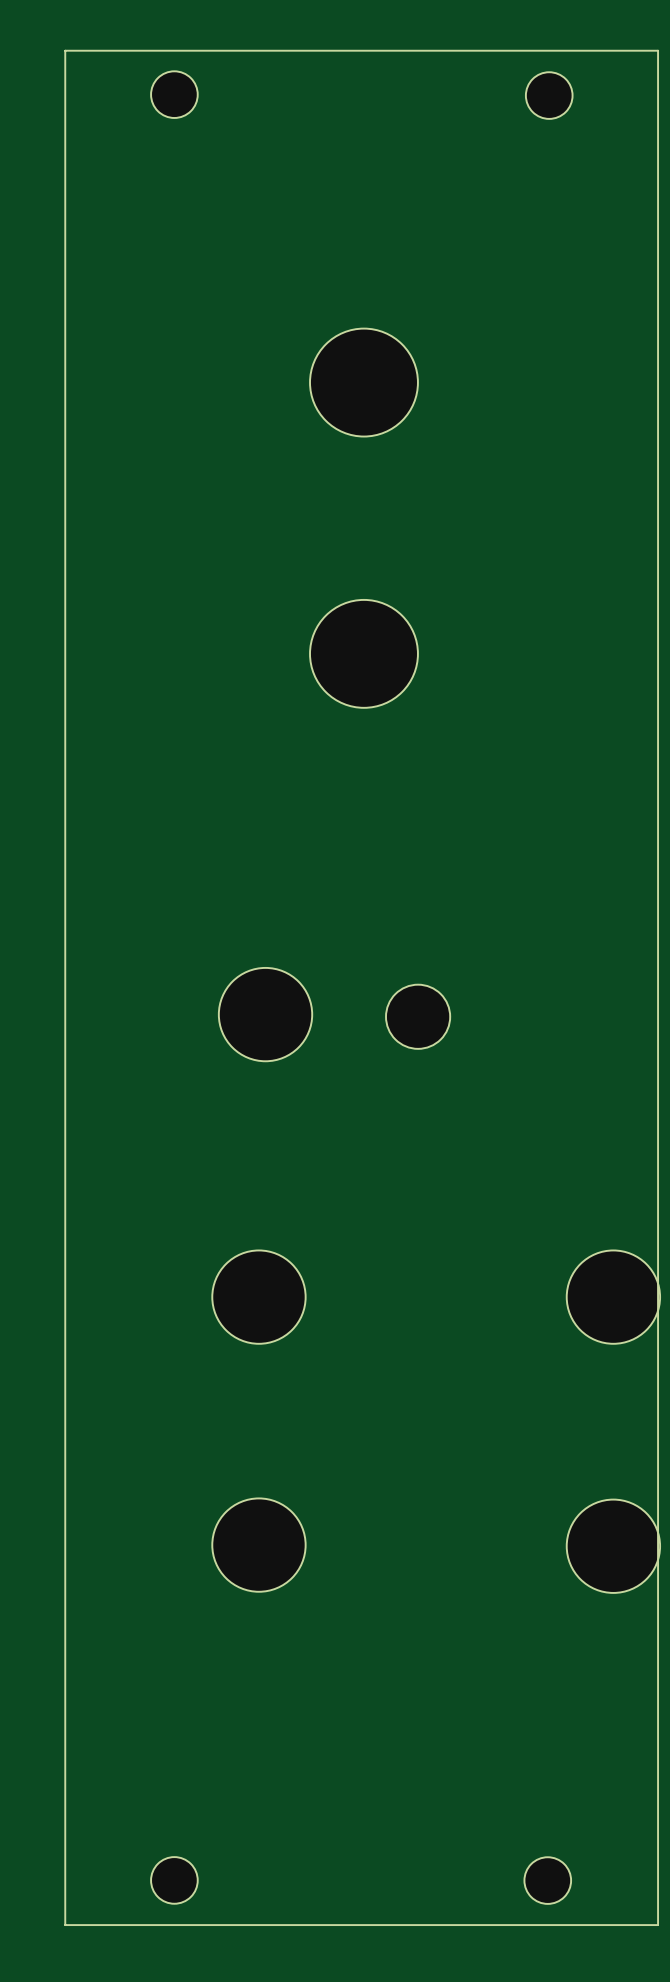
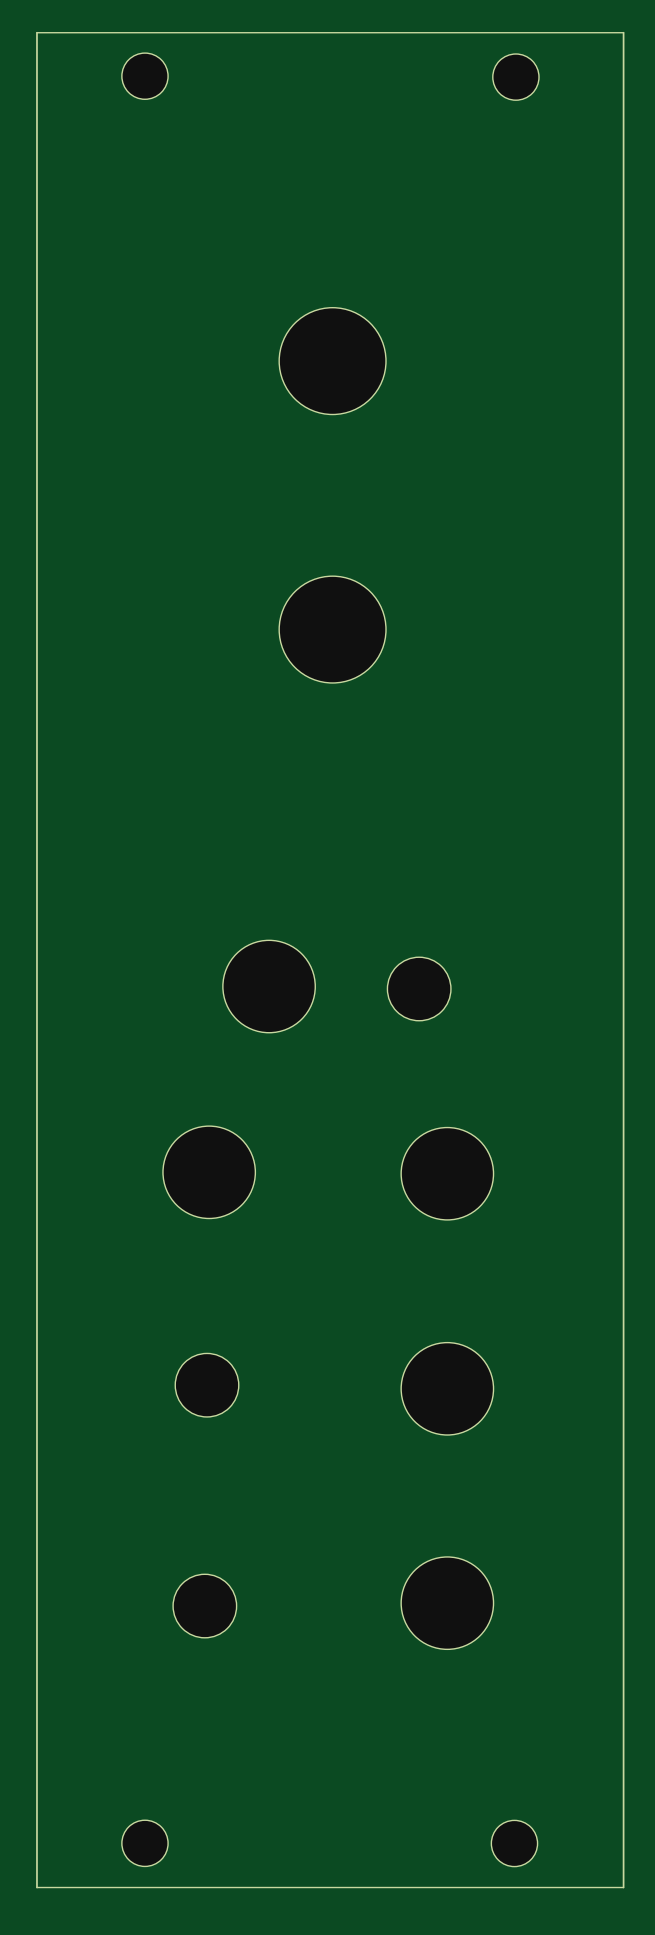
part position: (265, 1014) -> (269, 986)
part position: (418, 1016) -> (419, 988)
part: none -> (209, 1172)
part: none -> (447, 1173)
part: (258, 1297) -> none
part: (613, 1297) -> none
part: none -> (207, 1385)
part: none -> (447, 1388)
part: (258, 1545) -> none
part: (613, 1546) -> none
part: none -> (447, 1603)
part: none -> (204, 1606)

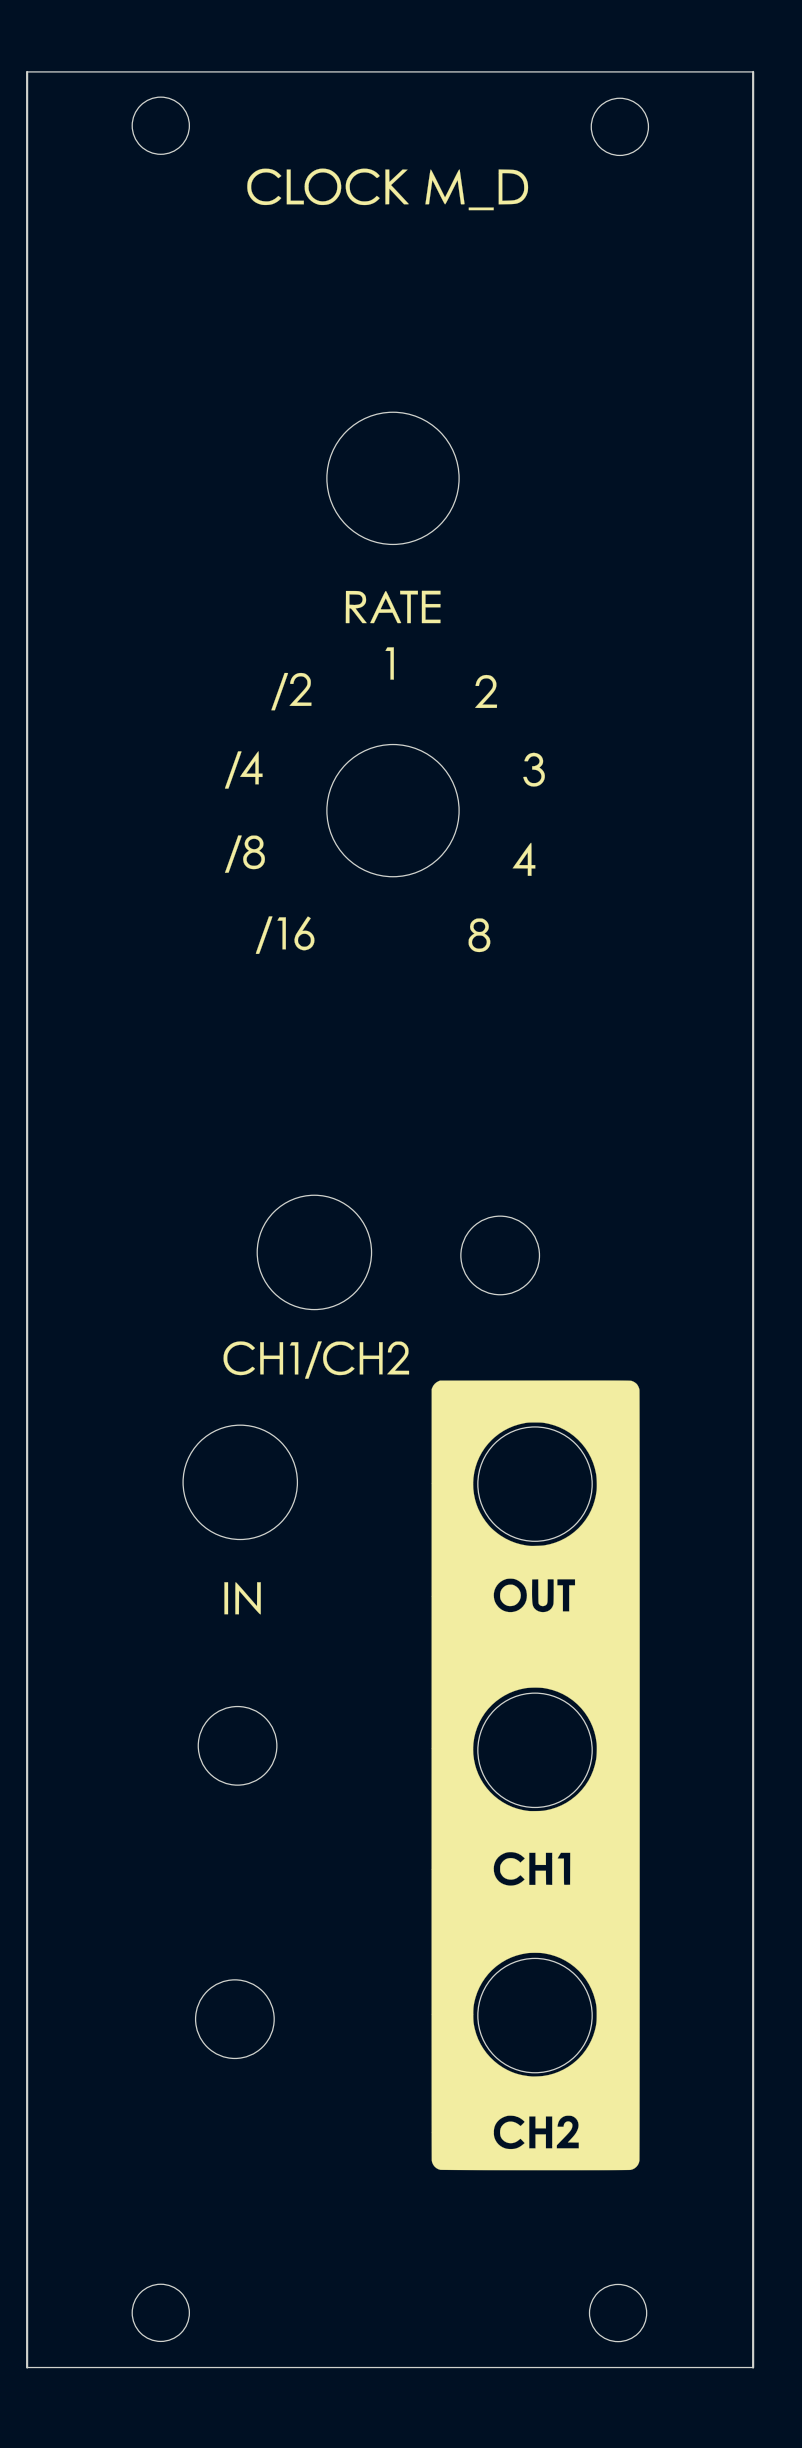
drawing: none -> [223, 168, 640, 2171]

